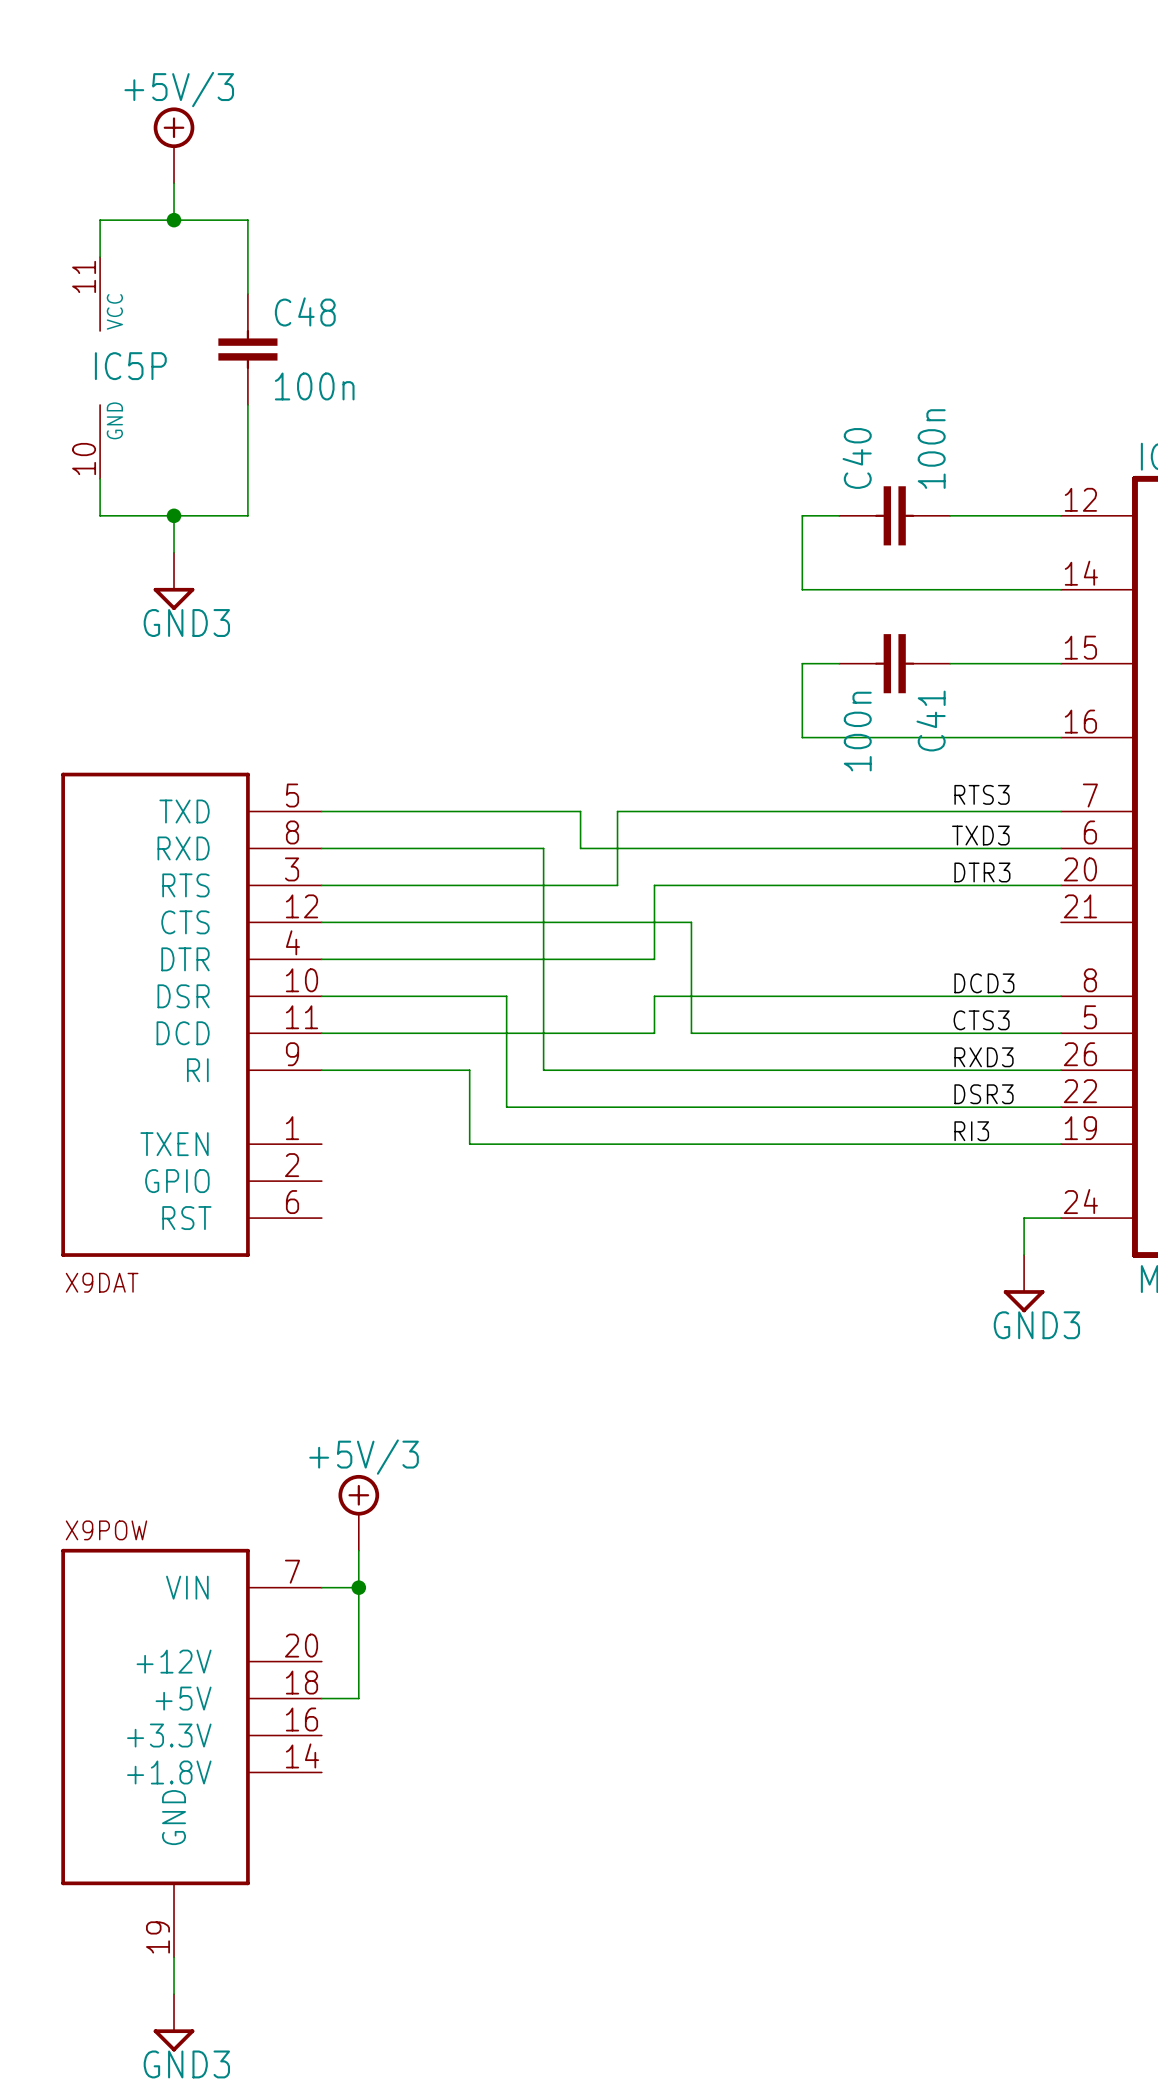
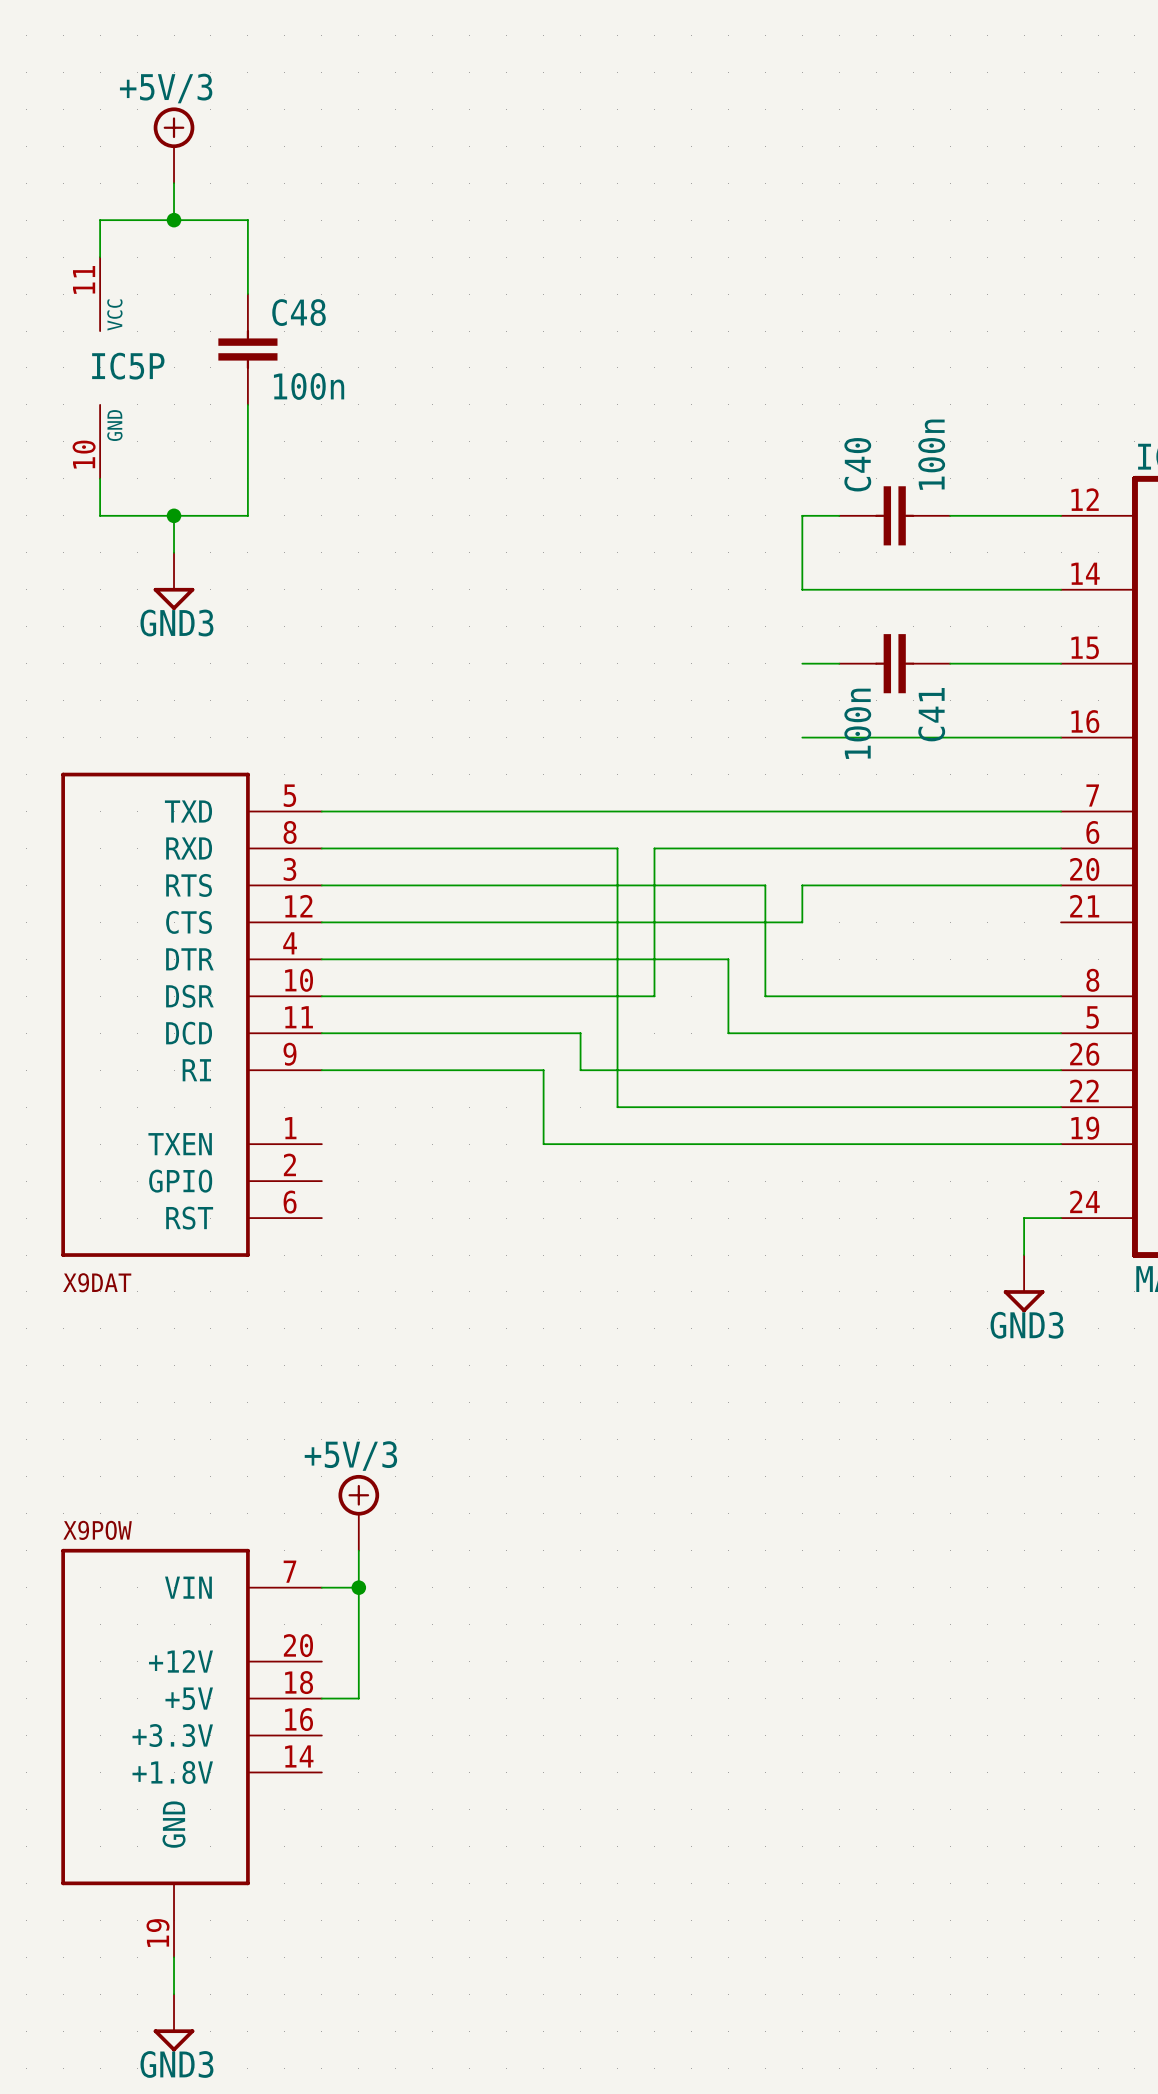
wire: (802, 663) (802, 737) -> none
label: RTS3 (982, 794) -> none
wire: (580, 811) (580, 848) -> (580, 811) (617, 811)
wire: (617, 811) (617, 848) (654, 848) -> (617, 1107) (617, 885) (654, 885) (654, 848)
label: TXD3 (980, 835) -> none
wire: (543, 848) (543, 1070) (580, 1070) -> (580, 1033) (580, 1070)
wire: none -> (543, 848) (580, 848)
label: DTR3 (982, 872) -> none
wire: (765, 885) (802, 885) -> (691, 922) (802, 922) (802, 885)
wire: (691, 922) (691, 1033) (728, 1033) -> none
label: DCD3 (984, 983) -> none
wire: (506, 996) (506, 1107) (617, 1107) -> (506, 996) (654, 996) (654, 959) (728, 959) (728, 1033)
wire: (765, 996) (654, 996) (654, 1033) (580, 1033) -> (765, 996) (765, 885)
label: CTS3 (981, 1020) -> none
label: RXD3 (984, 1057) -> none
wire: (469, 1070) (469, 1144) (543, 1144) -> (469, 1070) (543, 1070) (543, 1144)
label: DSR3 (984, 1094) -> none
label: RI3 (971, 1131) -> none

